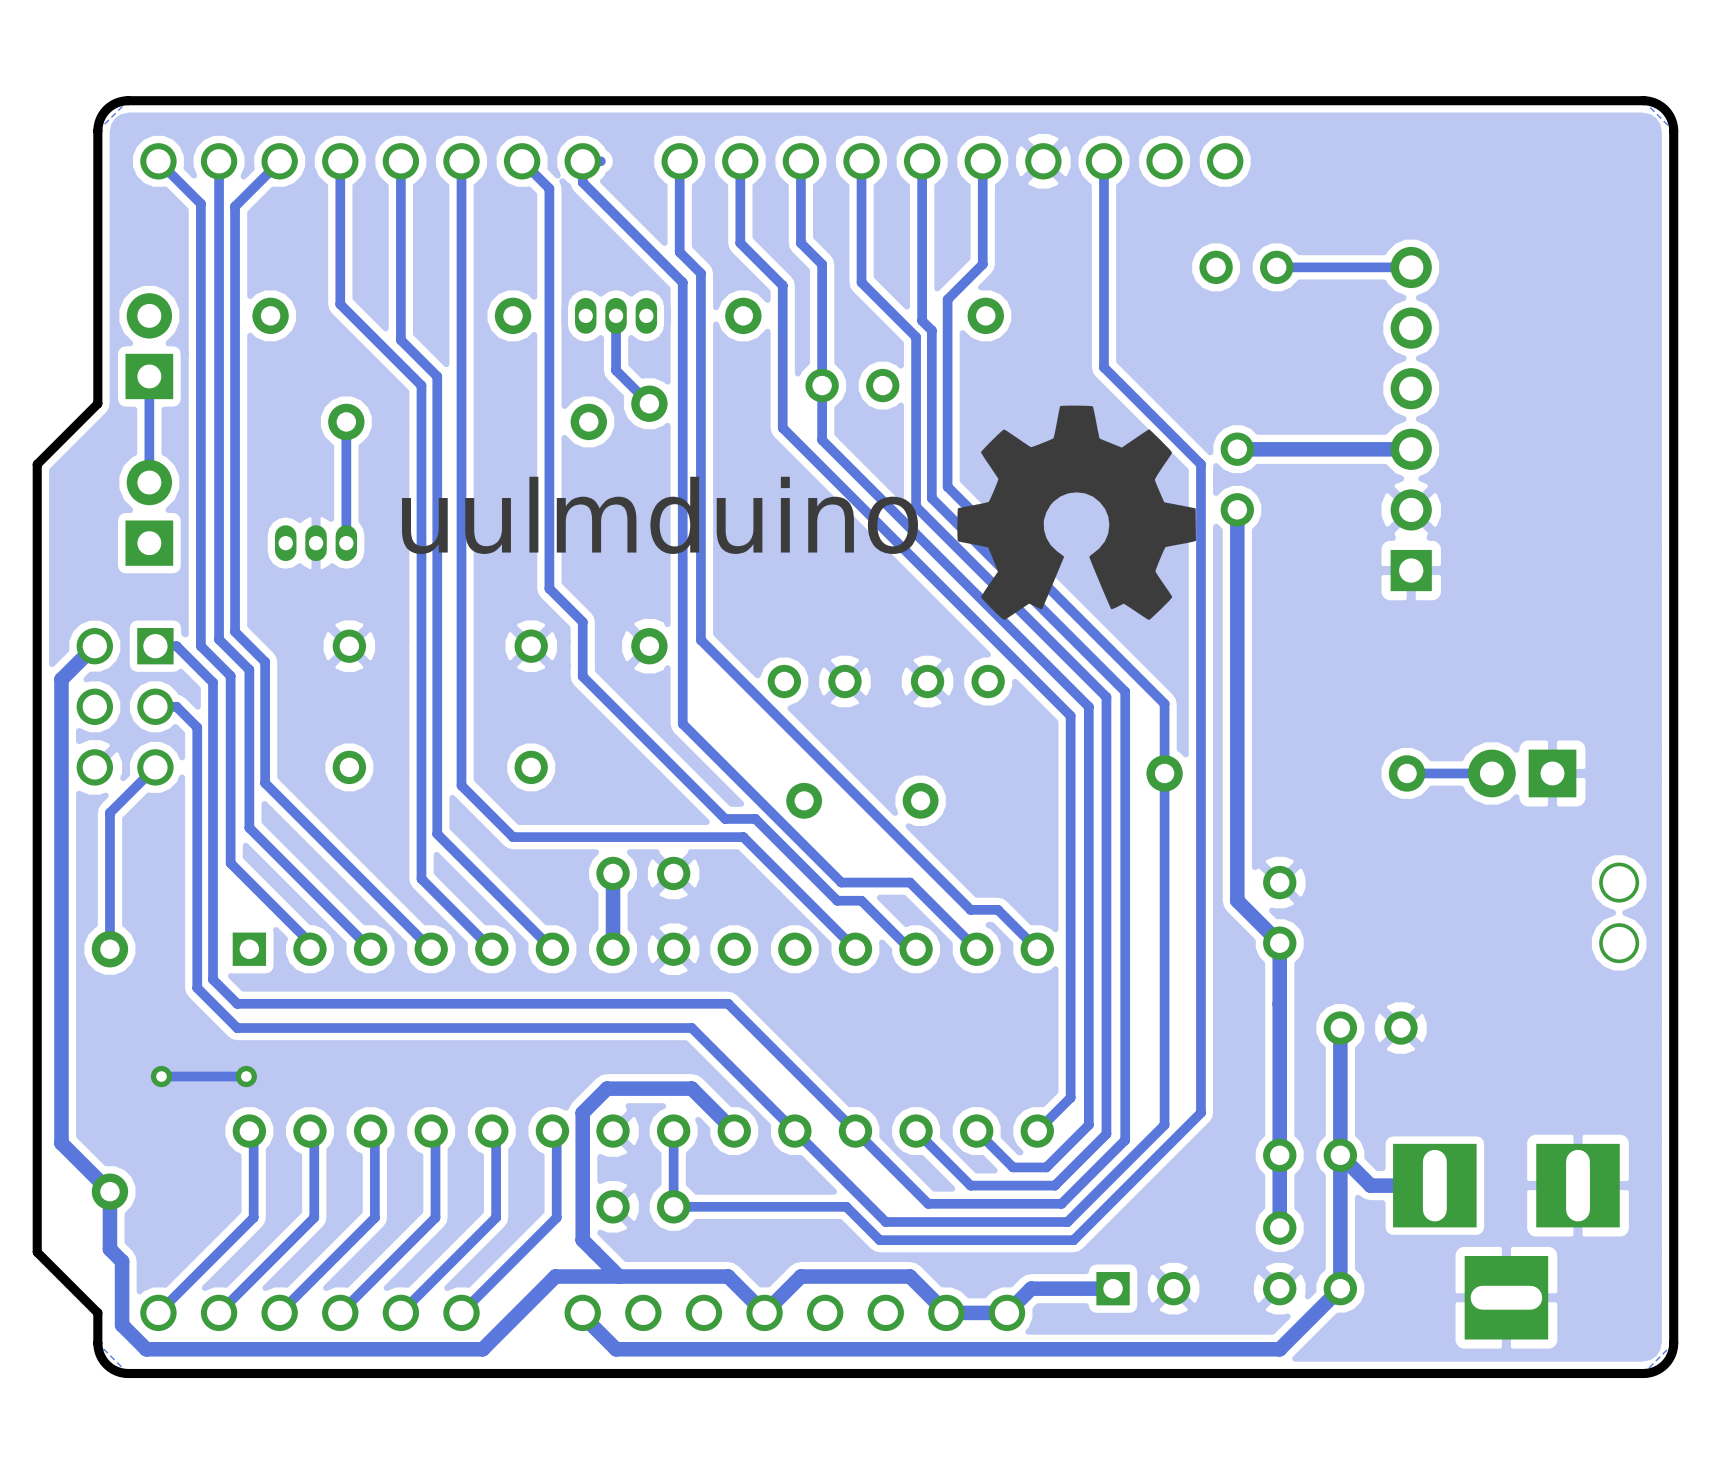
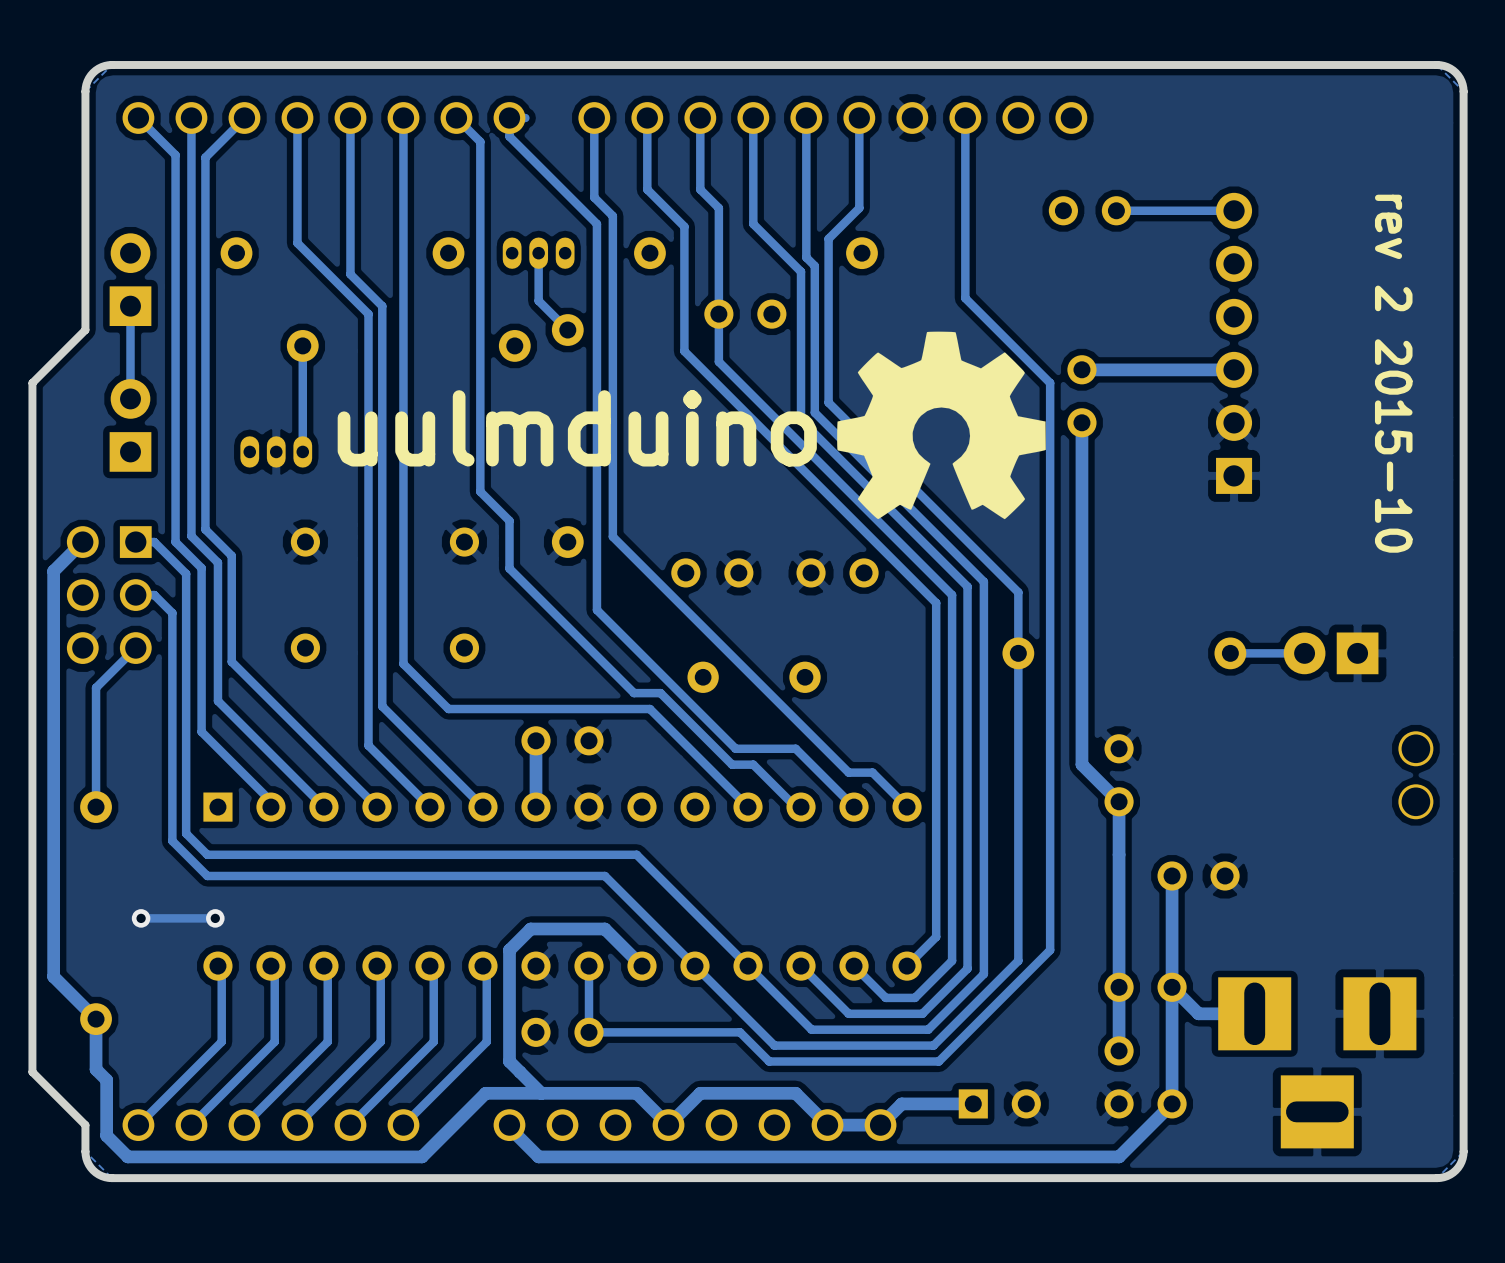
text: none -> rev 2 2015-10 (1393, 373)

